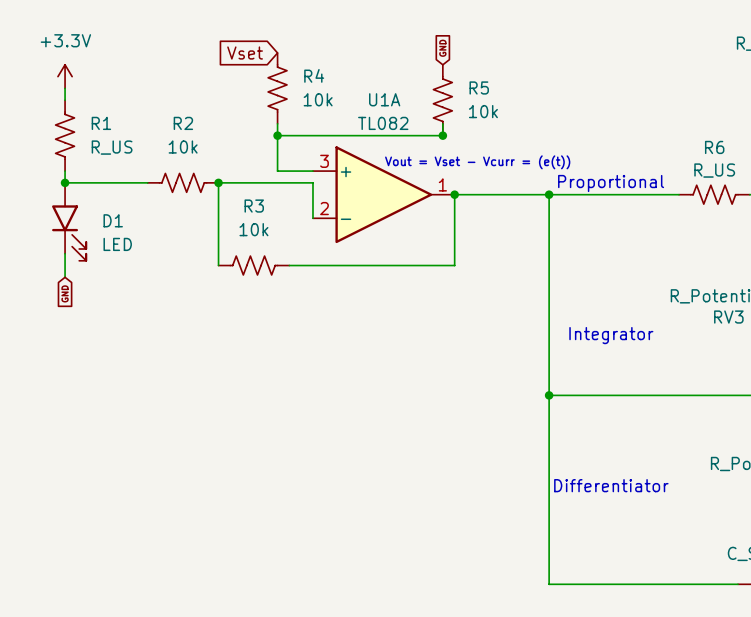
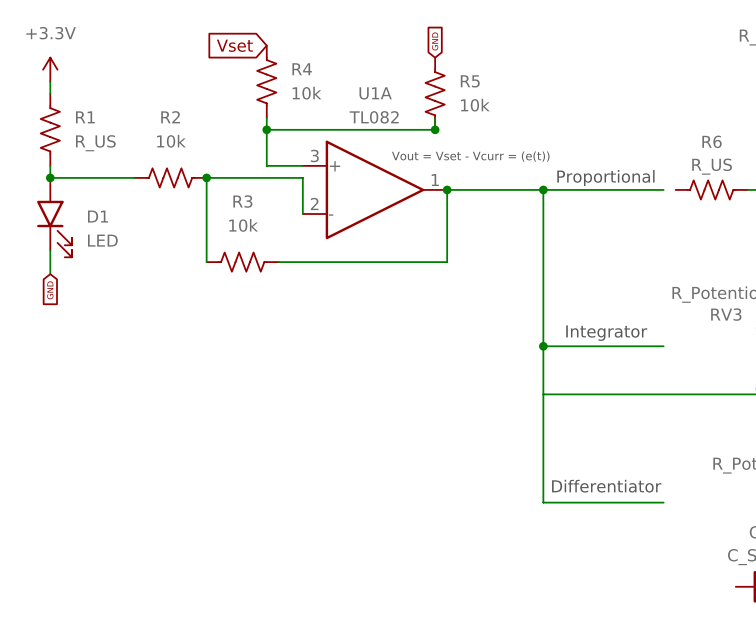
wire: (667, 194) (678, 194) -> none
wire: none -> (543, 346) (663, 346)
junction position: (549, 395) -> (543, 346)
wire: (549, 501) (549, 584) (738, 584) -> (543, 502) (663, 502)

